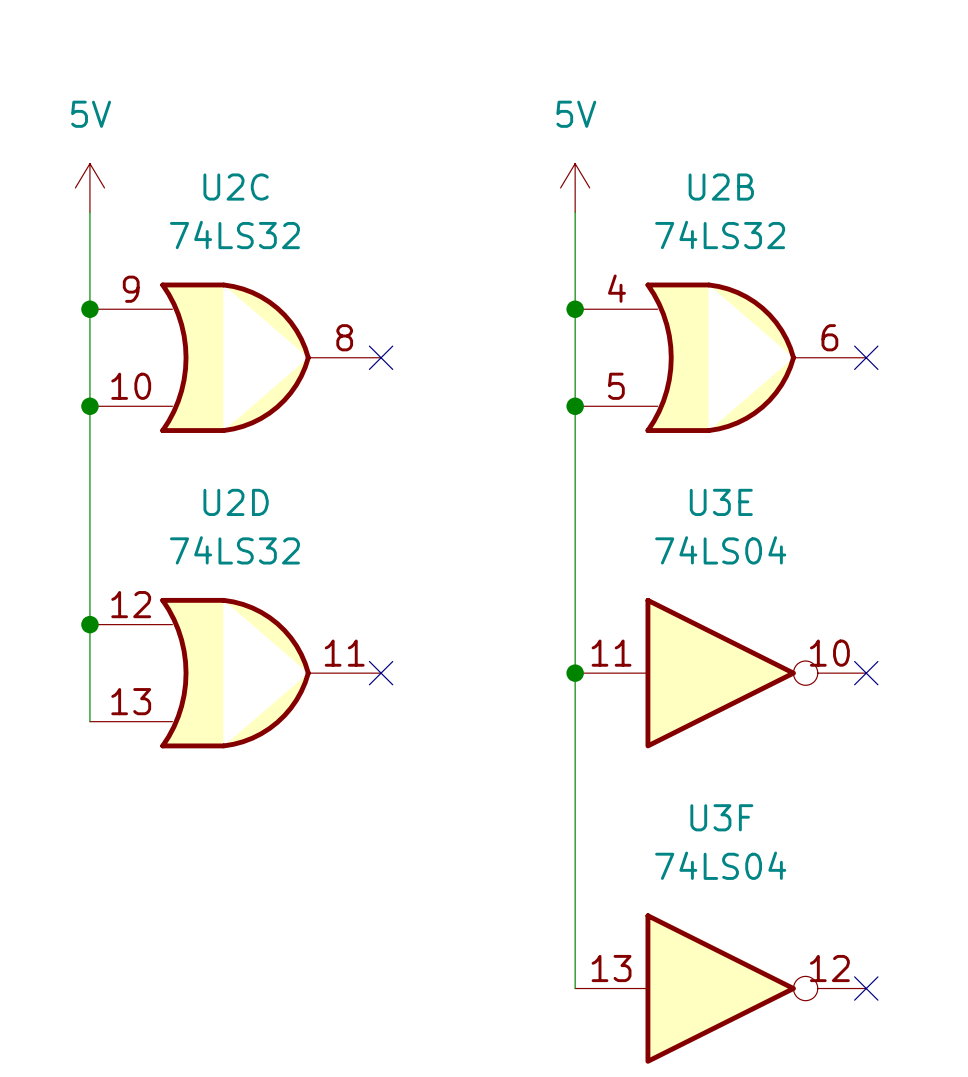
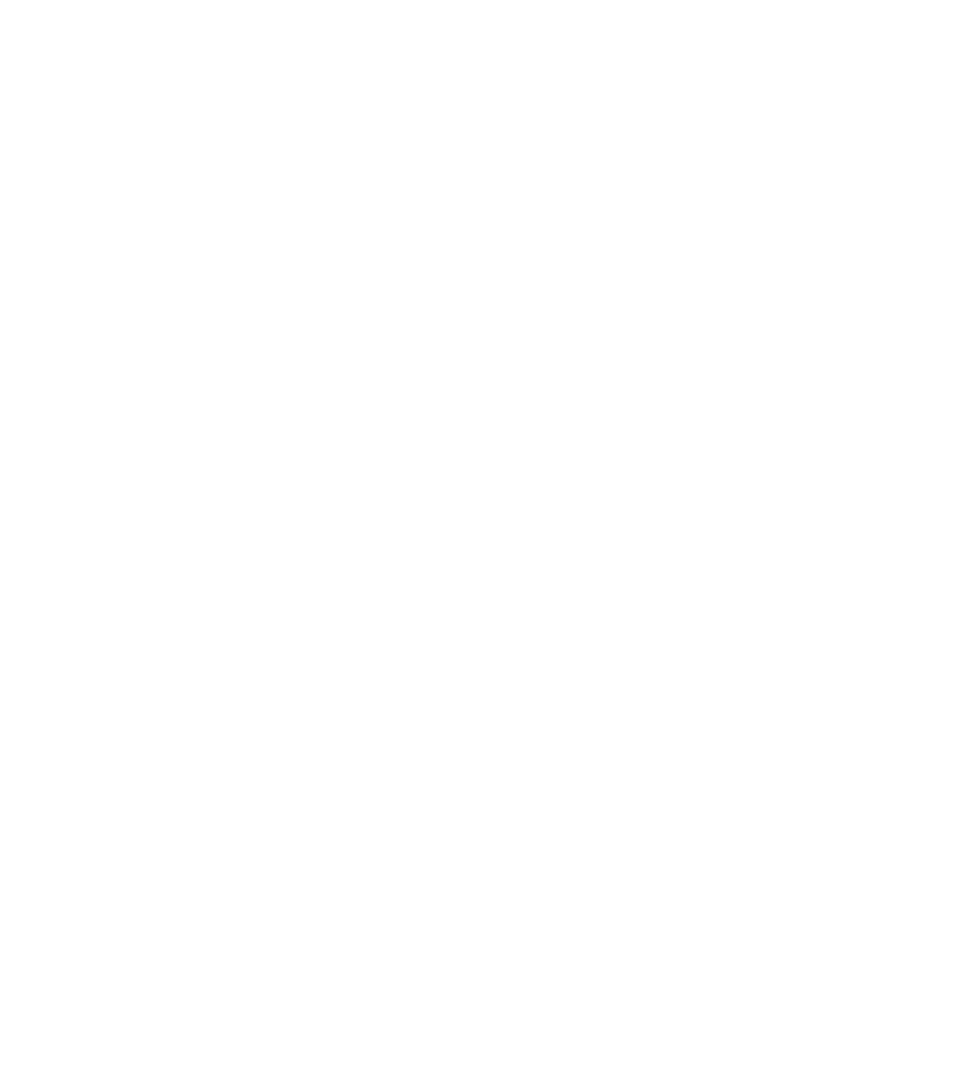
power symbol: 5V (89, 187) -> none
power symbol: 5V (575, 187) -> none
wire: (89, 212) (89, 721) -> none
wire: (575, 212) (575, 988) -> none
junction: (89, 309) -> none
junction: (575, 309) -> none
U2C: 74LS32 (235, 357) -> none
no-connect mark: (381, 357) -> none
U2B: 74LS32 (720, 357) -> none
no-connect mark: (866, 357) -> none
junction: (89, 406) -> none
junction: (575, 406) -> none
junction: (89, 624) -> none
U2D: 74LS32 (235, 673) -> none
no-connect mark: (381, 673) -> none
junction: (575, 673) -> none
U3E: 74LS04 (720, 673) -> none
no-connect mark: (866, 673) -> none
U3F: 74LS04 (720, 988) -> none
no-connect mark: (866, 988) -> none

